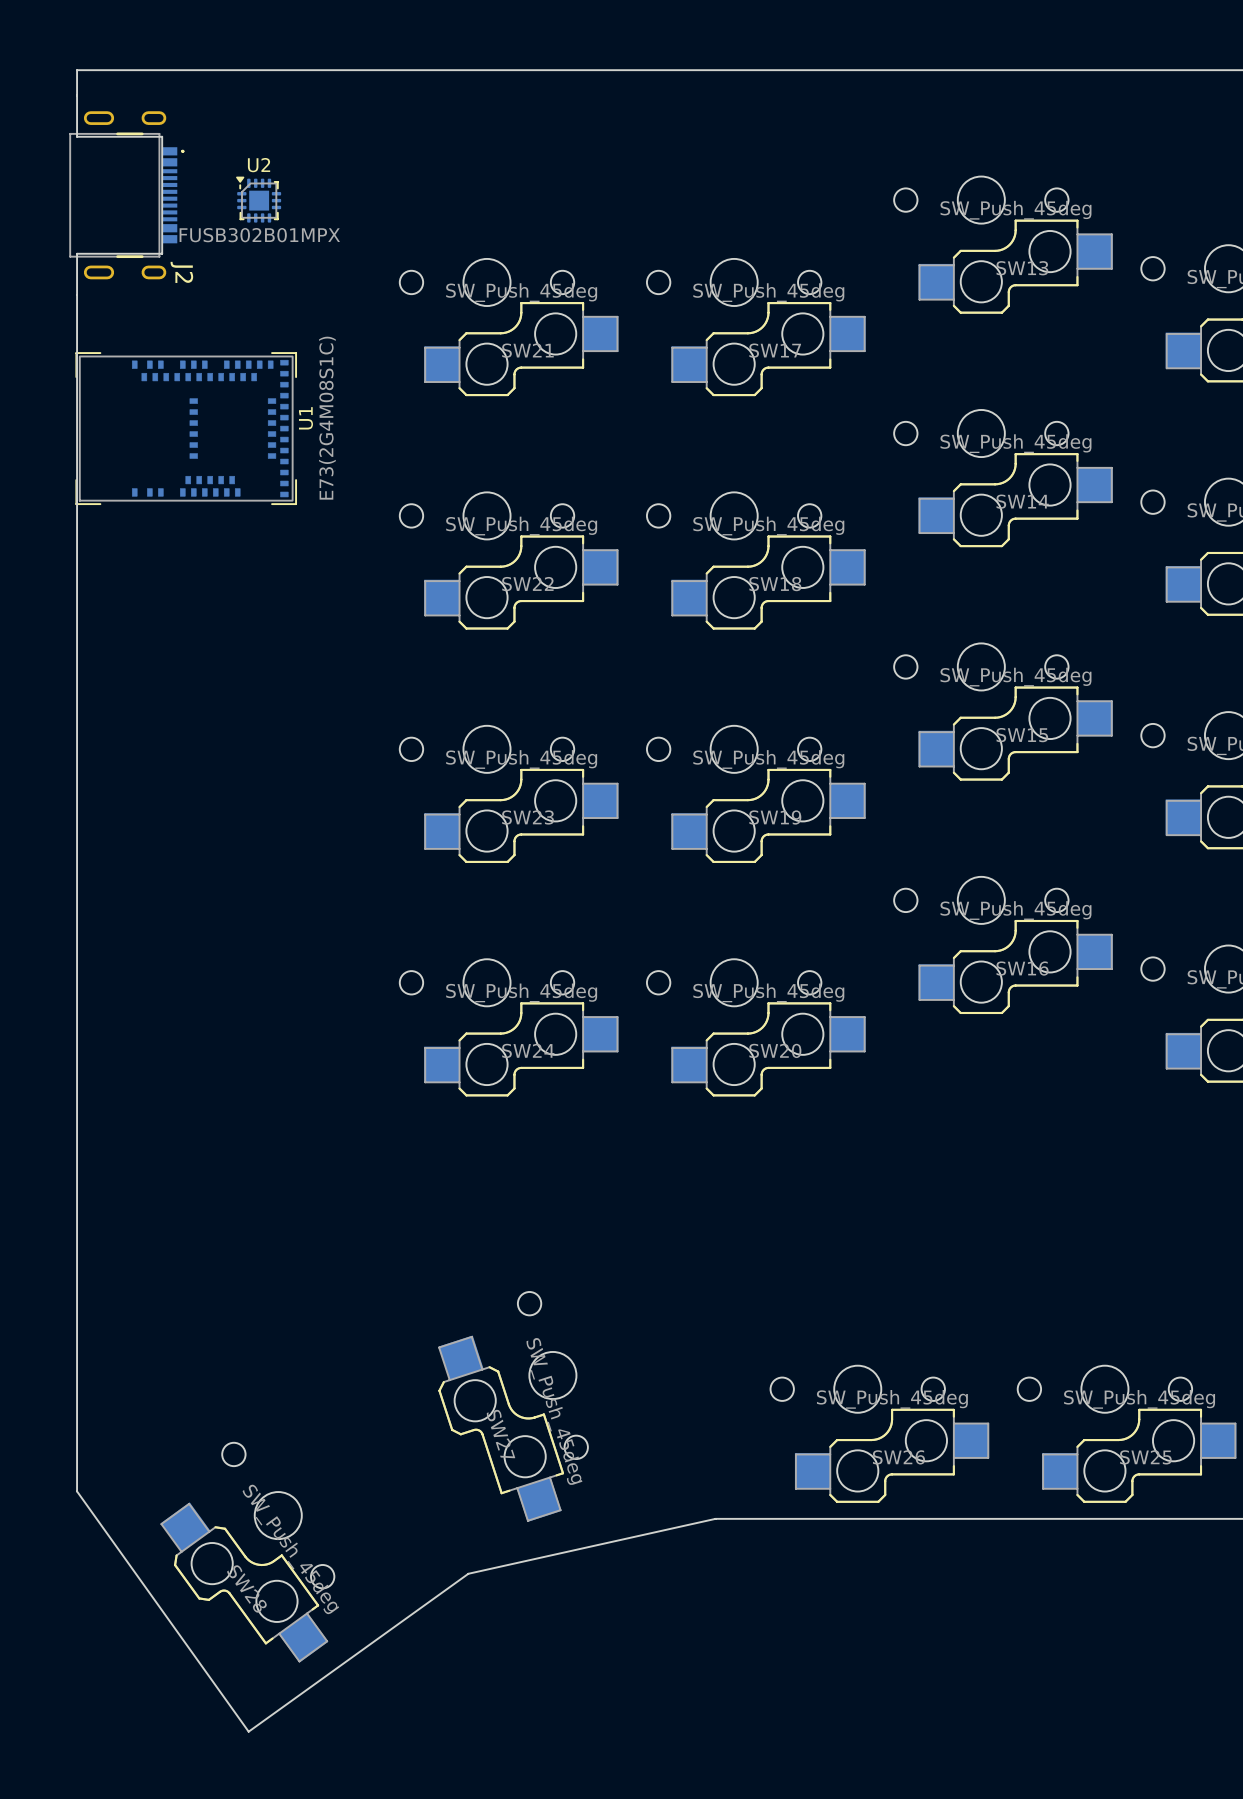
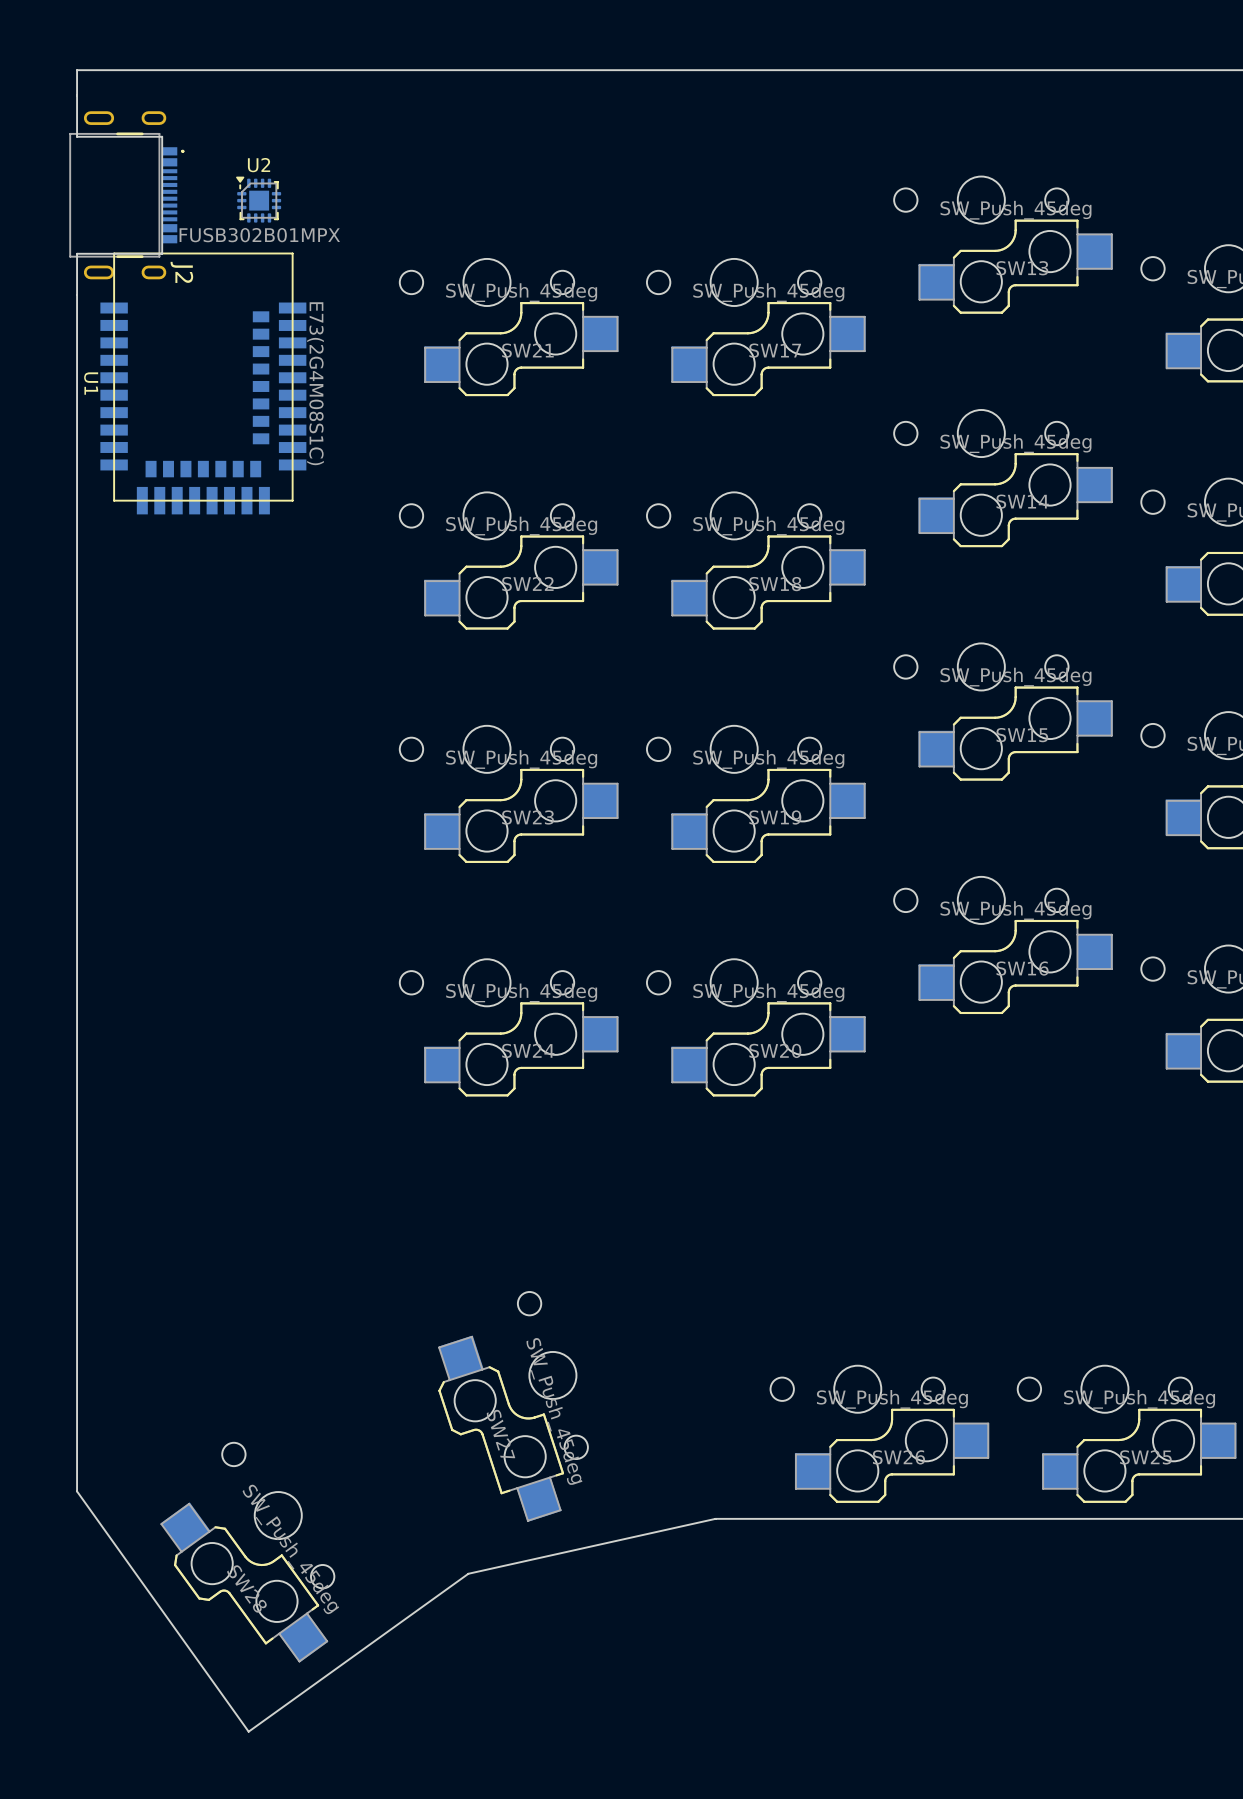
U1 footprint: [75, 352, 297, 505] -> [100, 252, 307, 515]
U1 name position: U1 (305, 418) -> U1 (91, 383)
U1 value position: E73(2G4M08S1C) (327, 418) -> E73(2G4M08S1C) (315, 383)

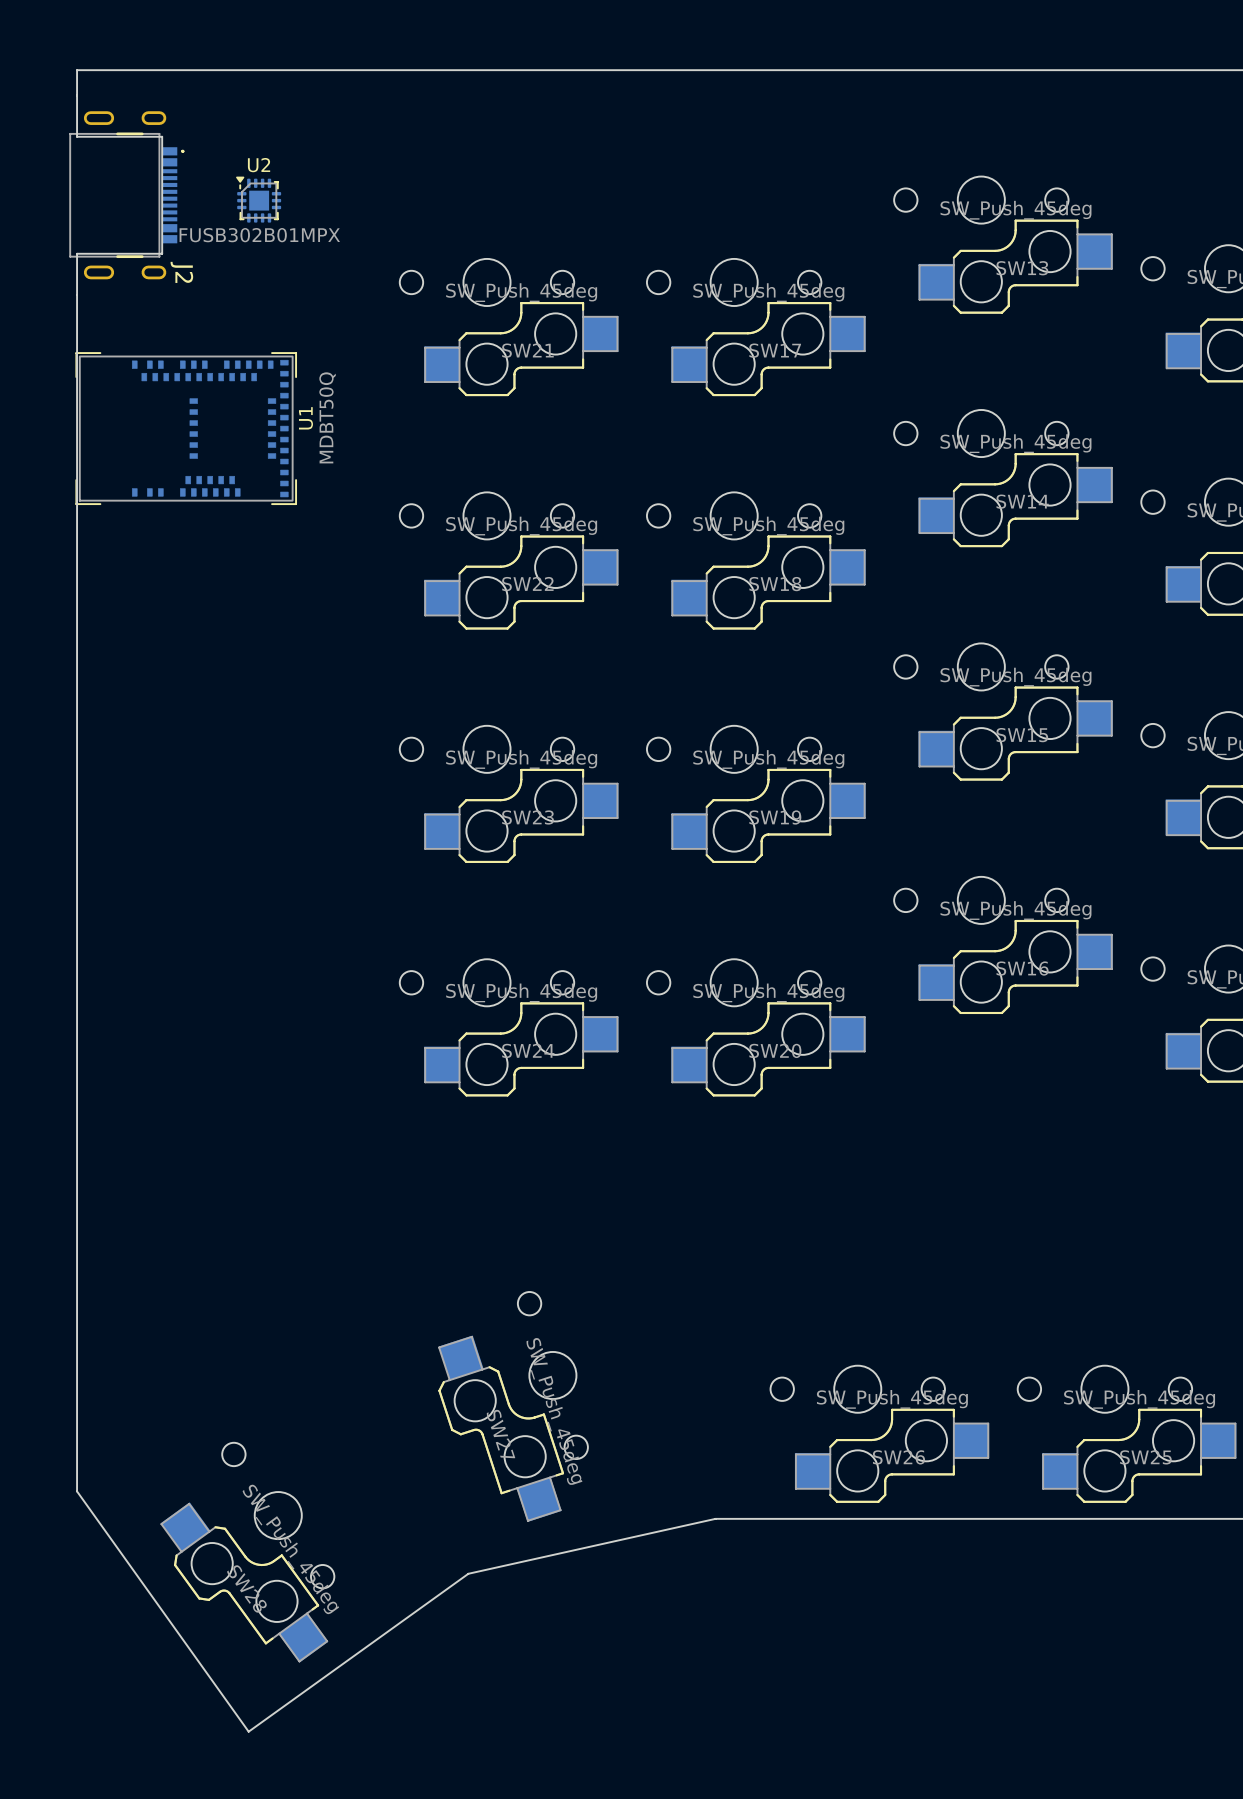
U1 footprint: [100, 252, 307, 515] -> [75, 352, 297, 505]
U1 name position: U1 (91, 383) -> U1 (305, 418)
U1 value: E73(2G4M08S1C) (315, 383) -> MDBT50Q (327, 417)

